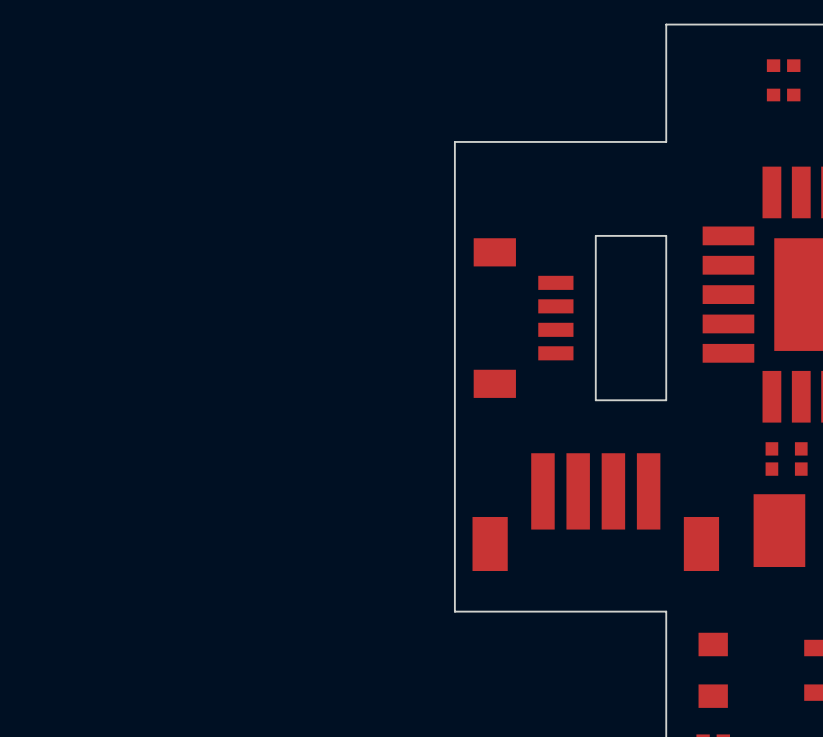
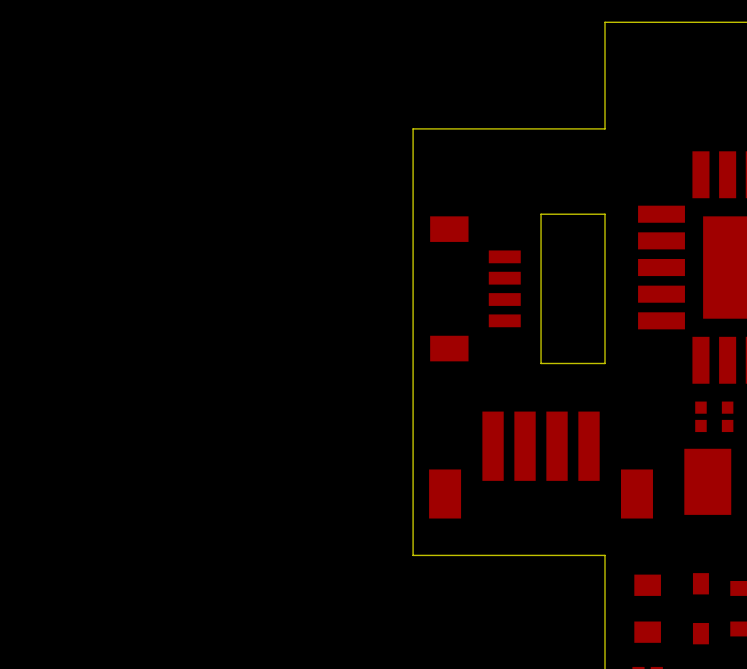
part: (783, 65) -> none
part: (783, 95) -> none
part: none -> (700, 608)

